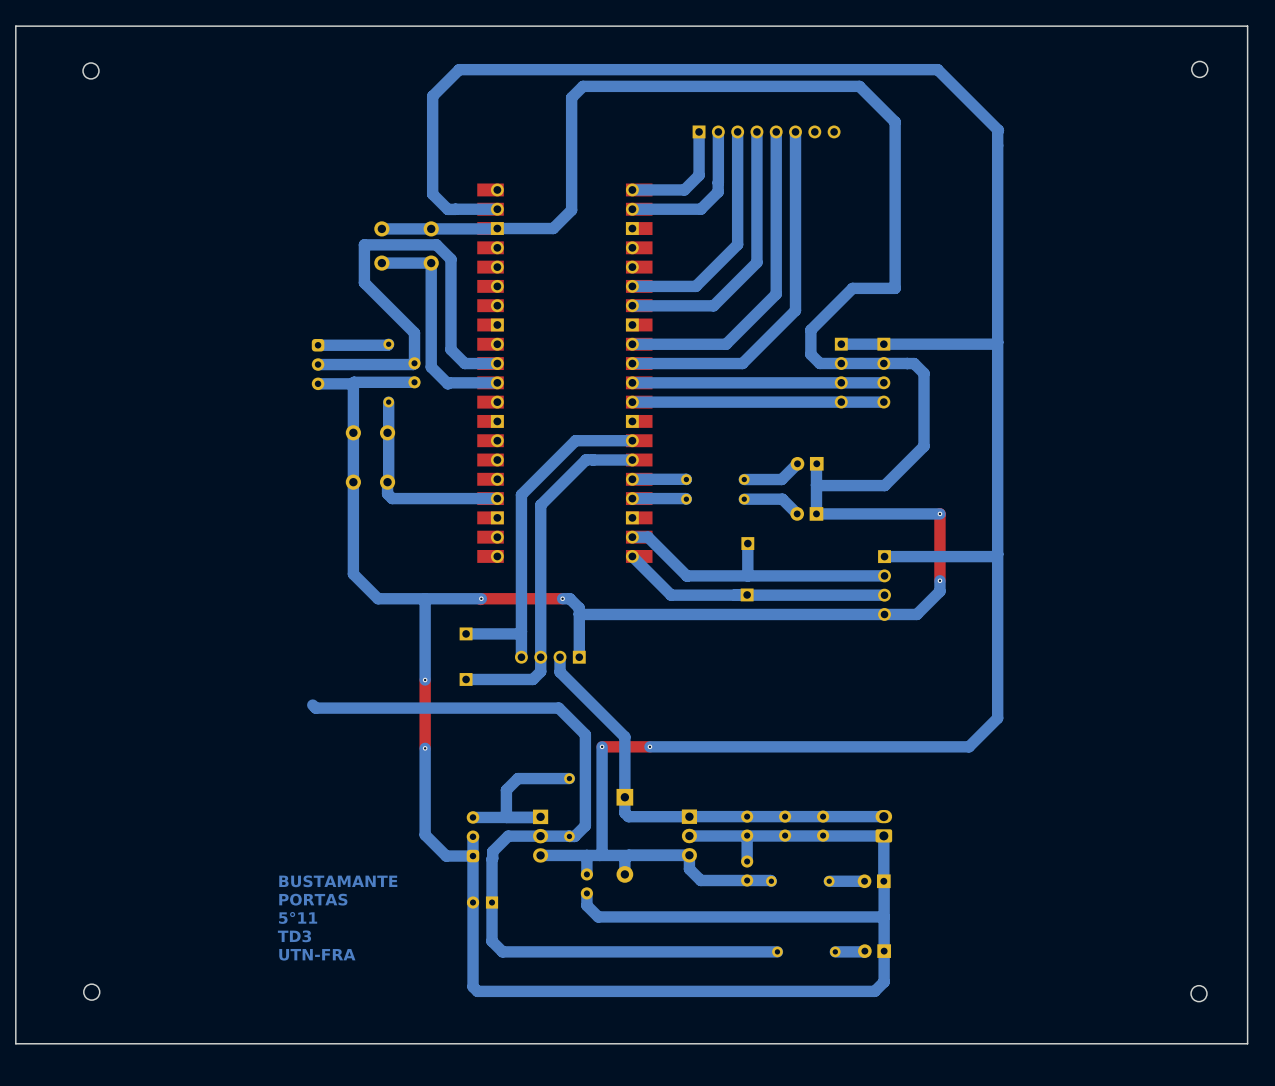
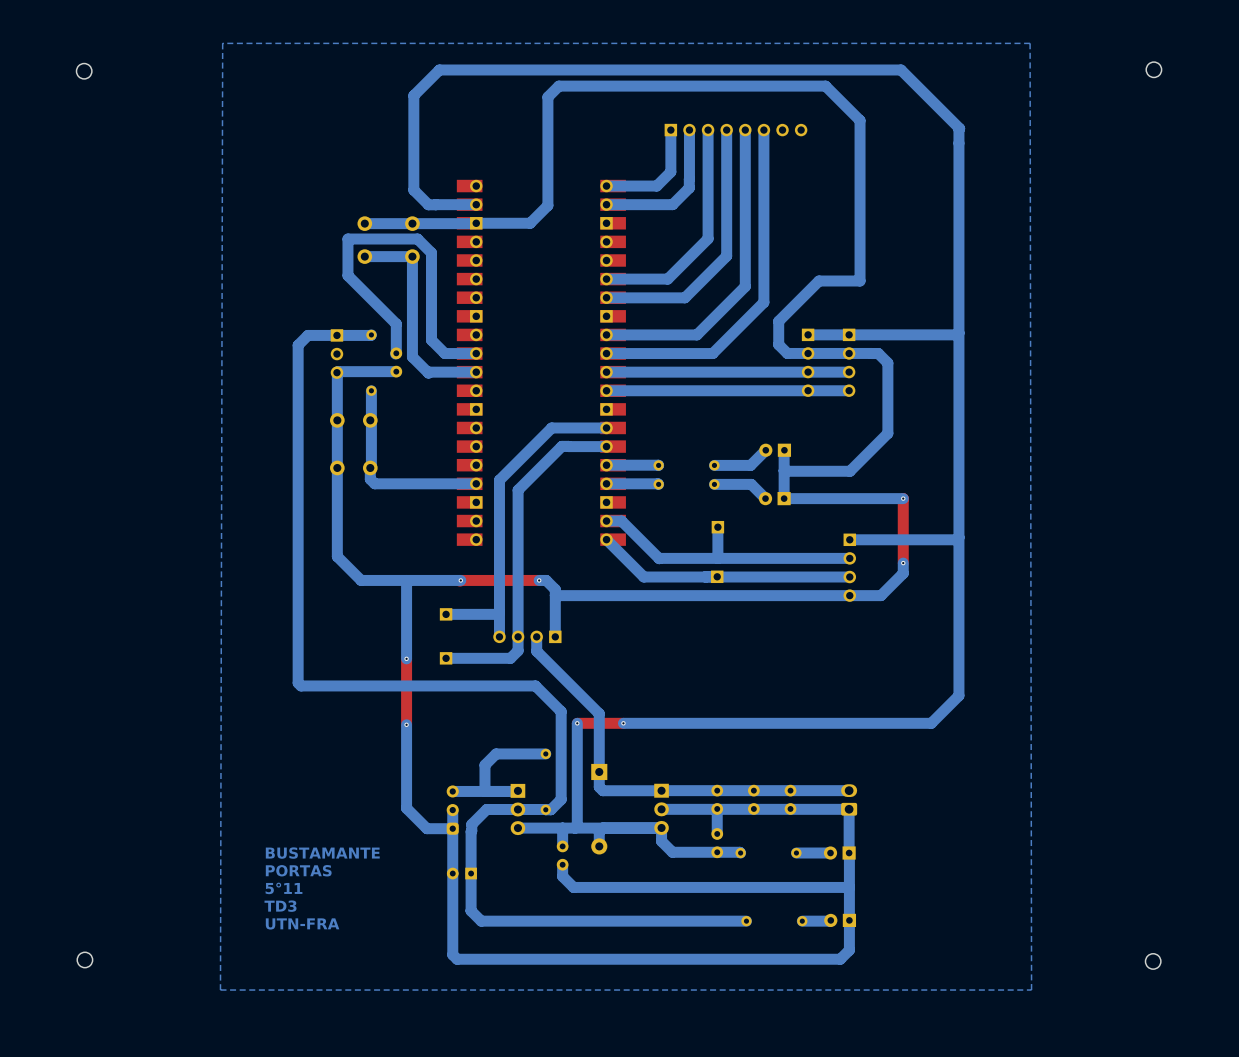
board edge: (1247, 26) (15, 26) (15, 1043) (1247, 1043) (1247, 26) -> none
bottom zone outline: none -> (1030, 43) (222, 43) (220, 990) (1031, 990) (1030, 43)
bottom track: (388, 344) (318, 345) -> (370, 335) (307, 335) (298, 345) (298, 683)
part: (318, 364) -> none
part: none -> (336, 354)
bottom track: (413, 364) (318, 364) -> none
bottom track: (353, 383) (318, 383) -> none

